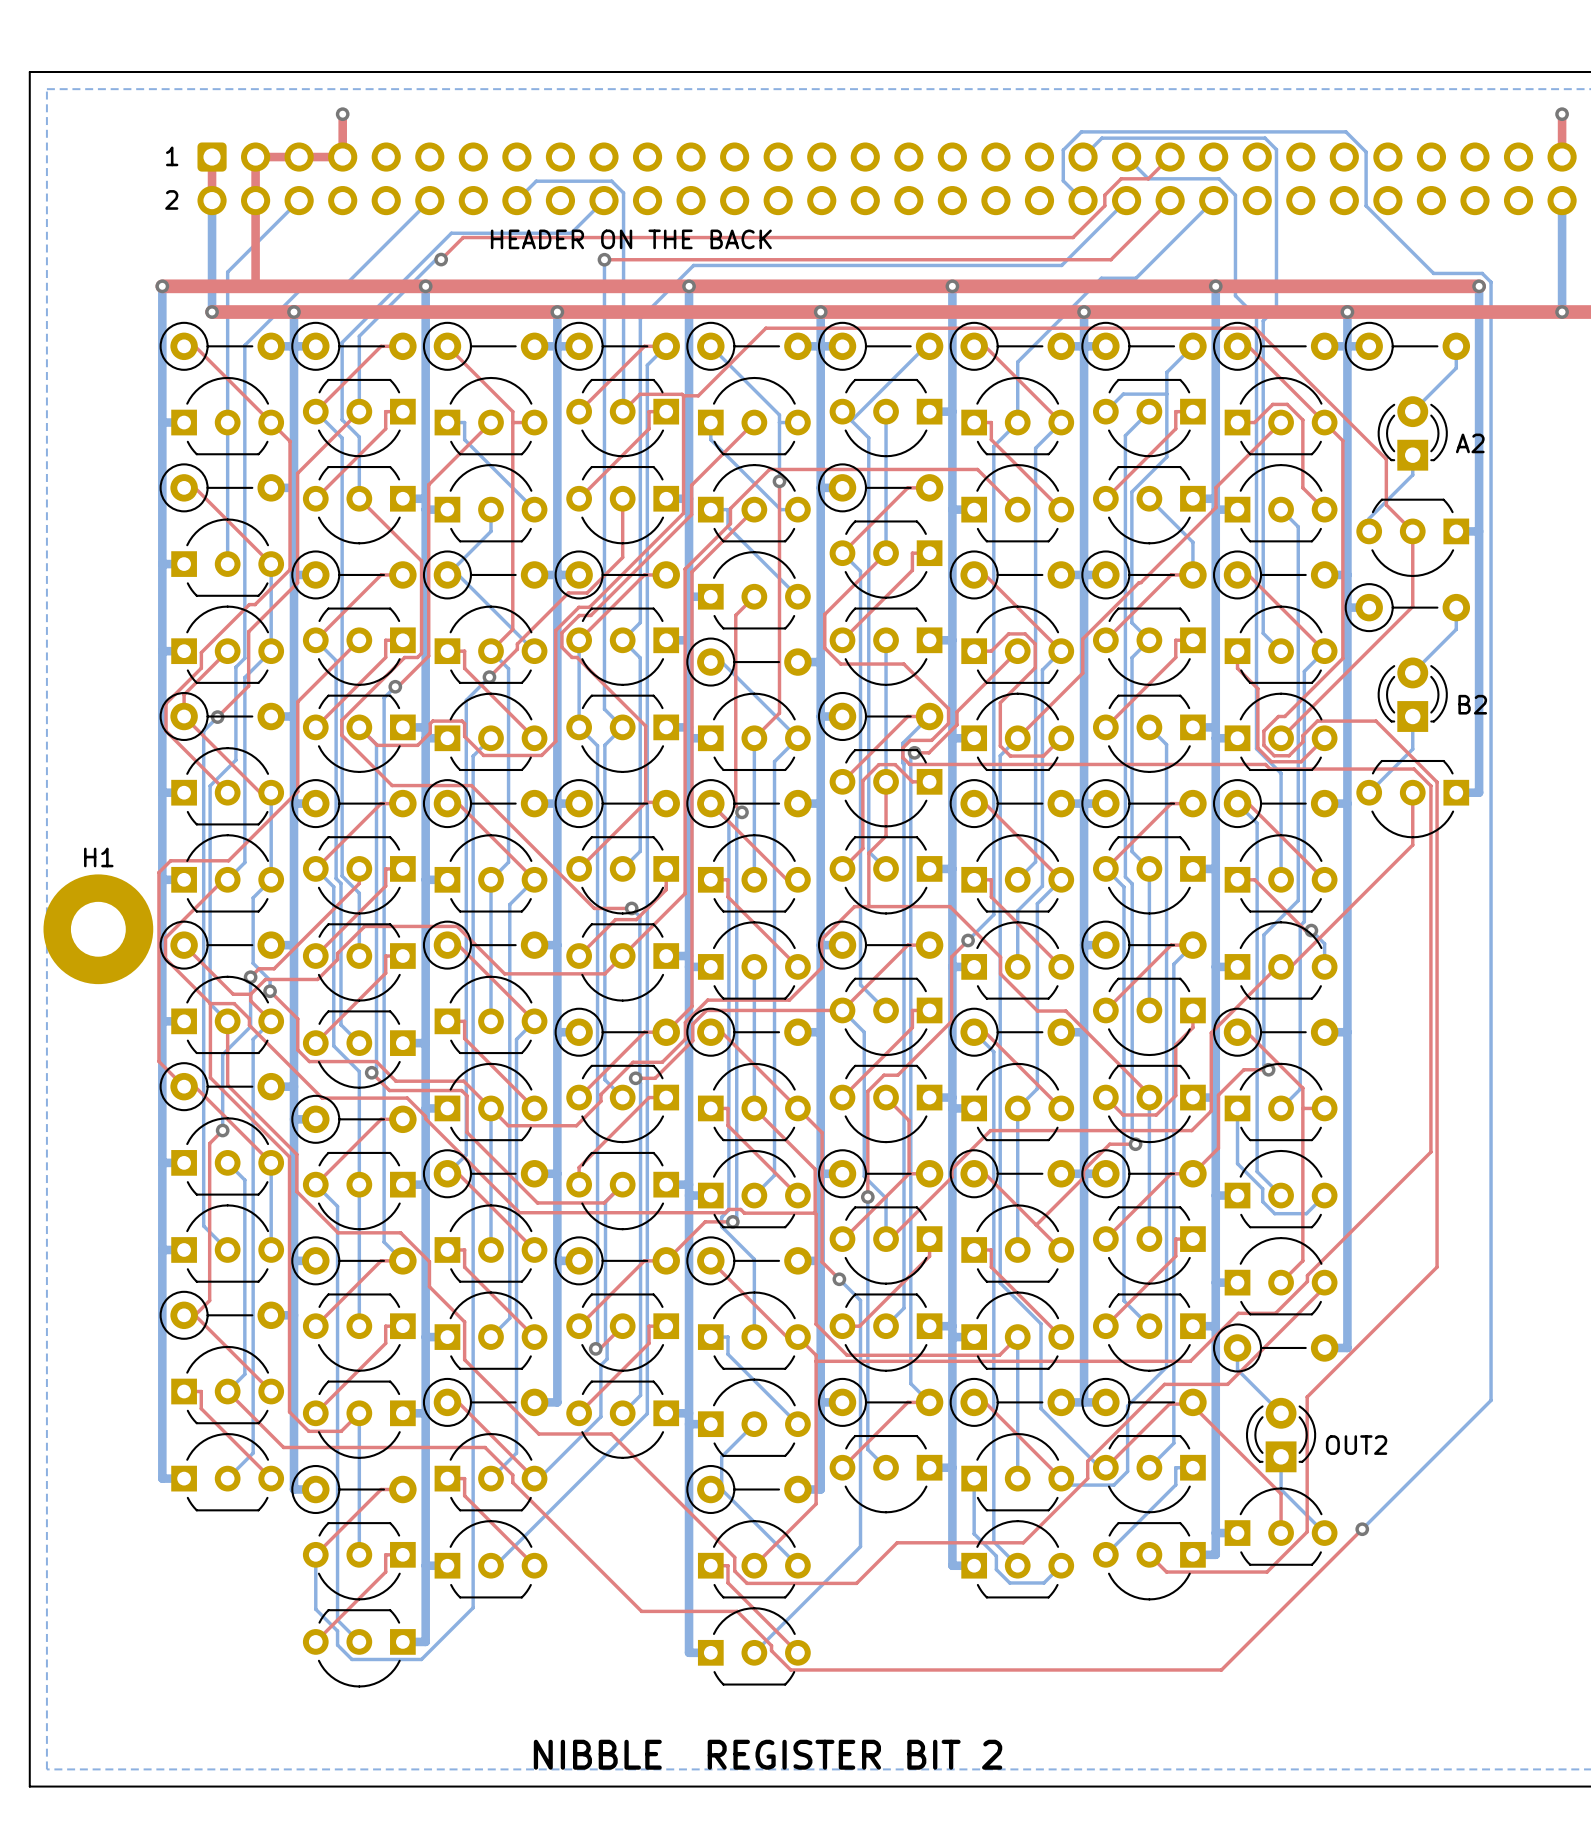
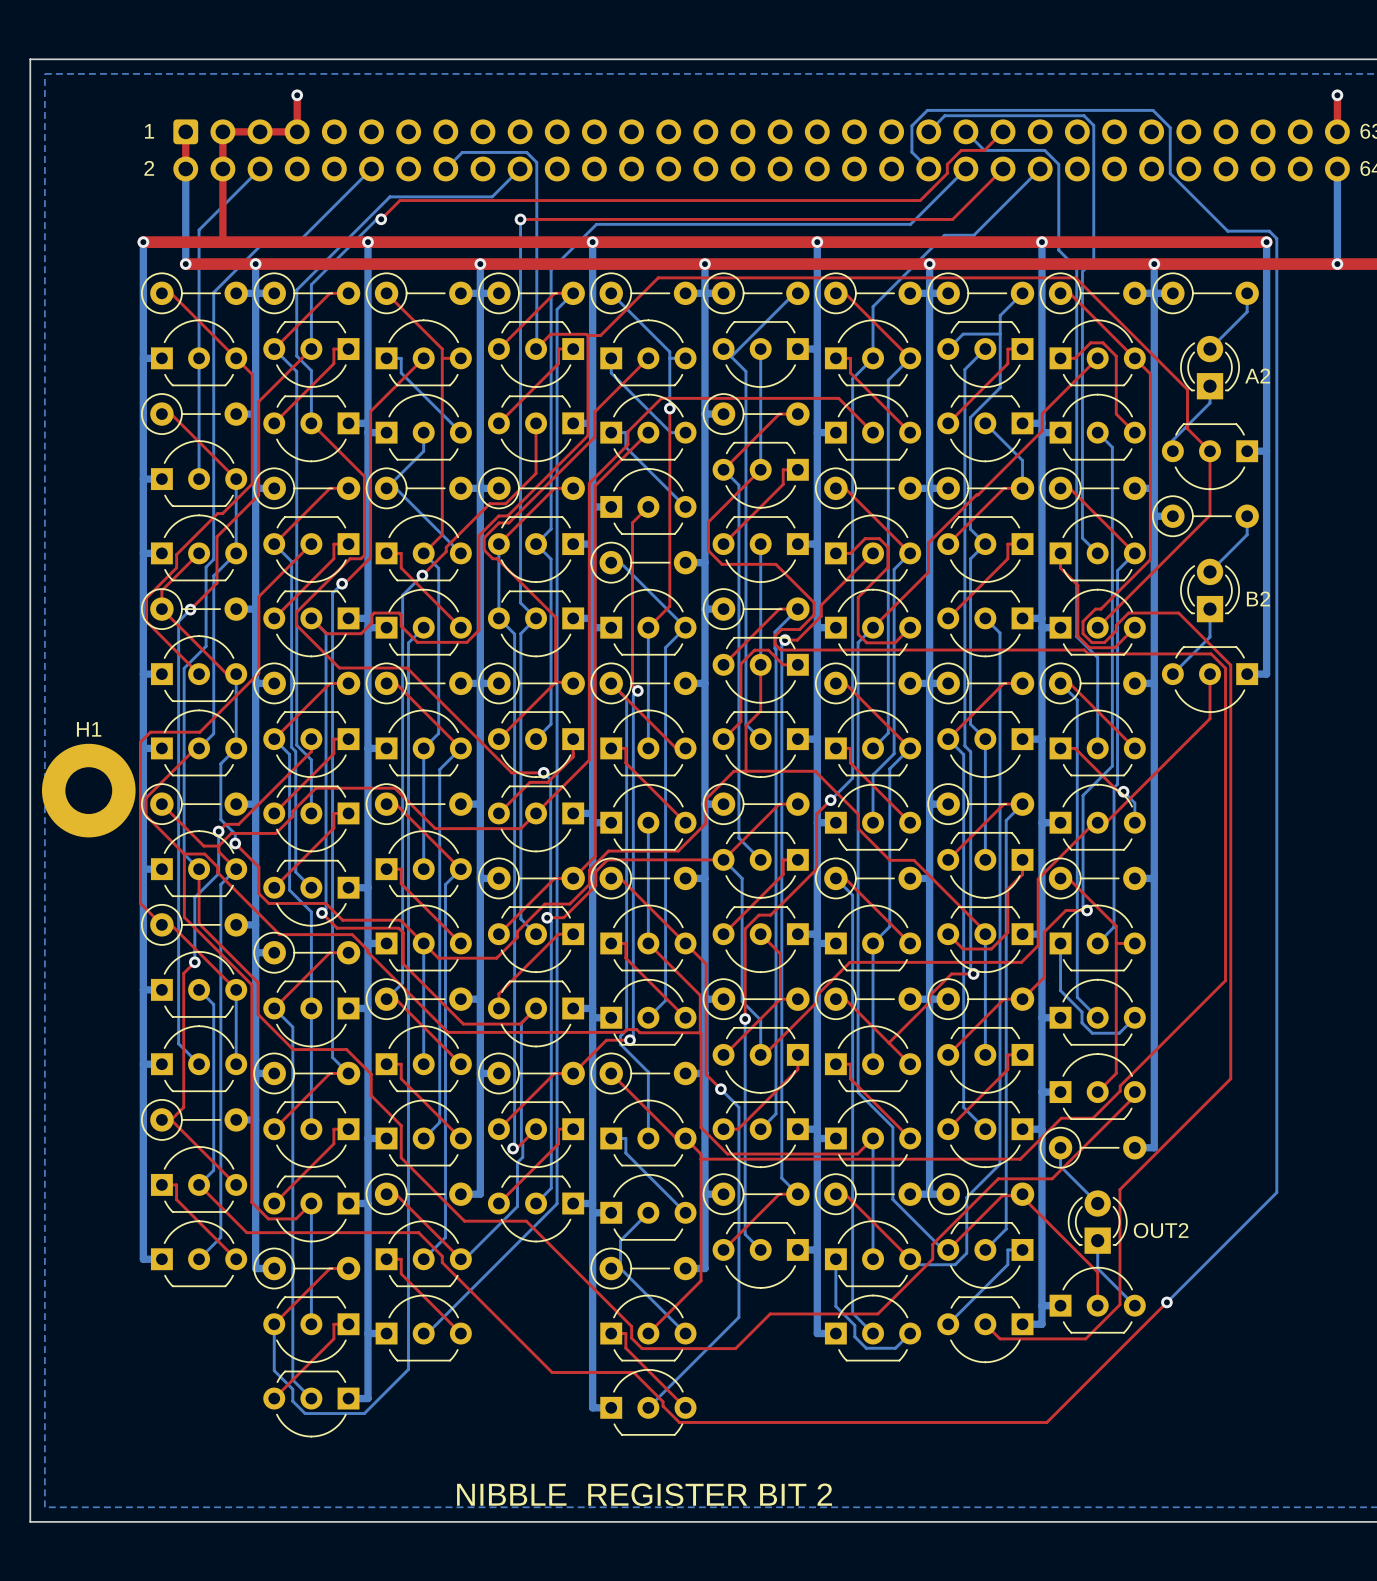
text: HEADER ON THE BACK (631, 239) -> none

